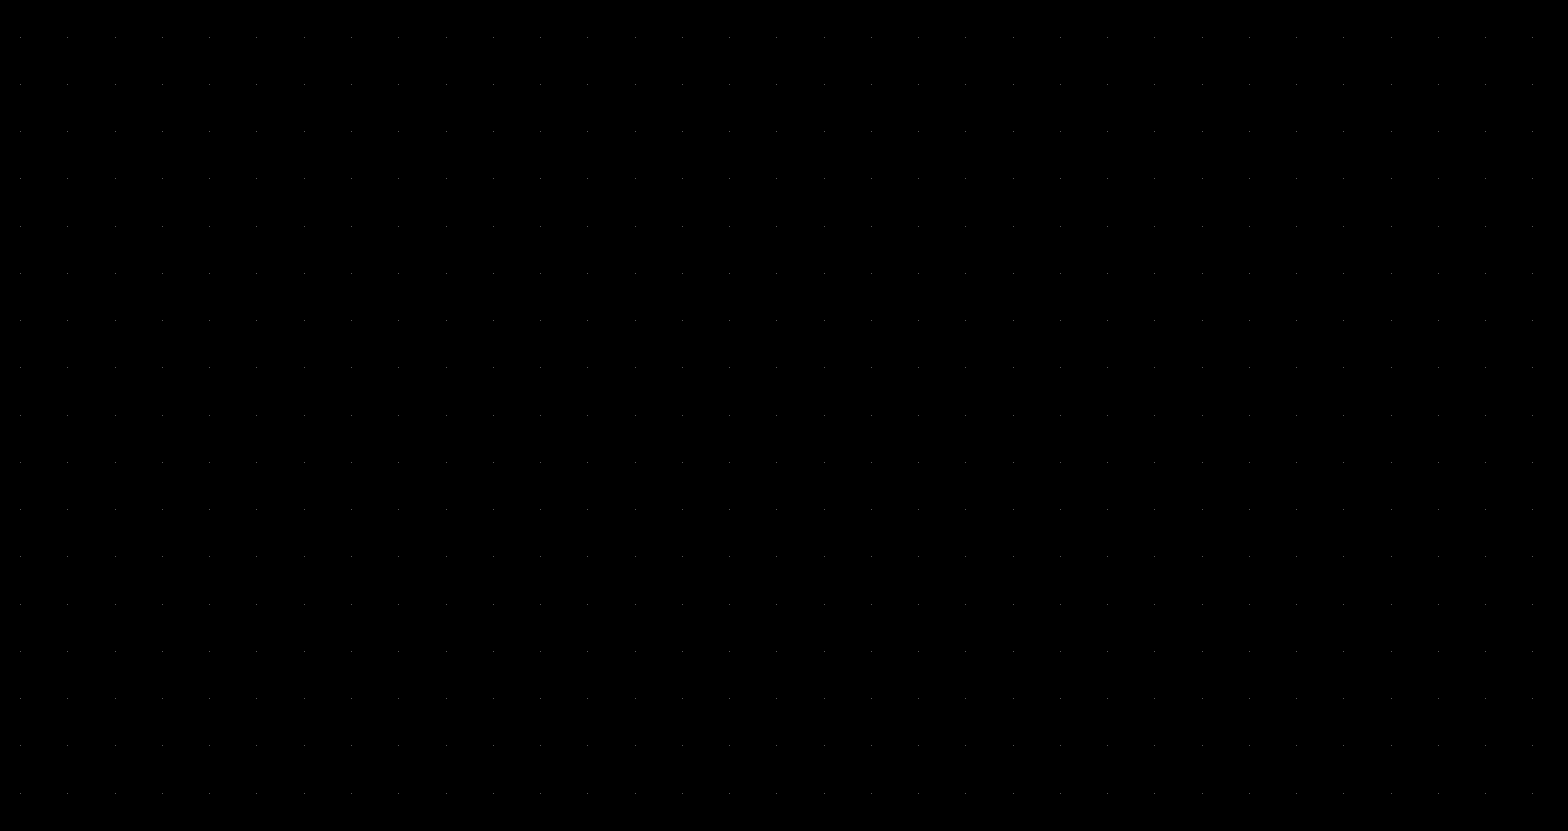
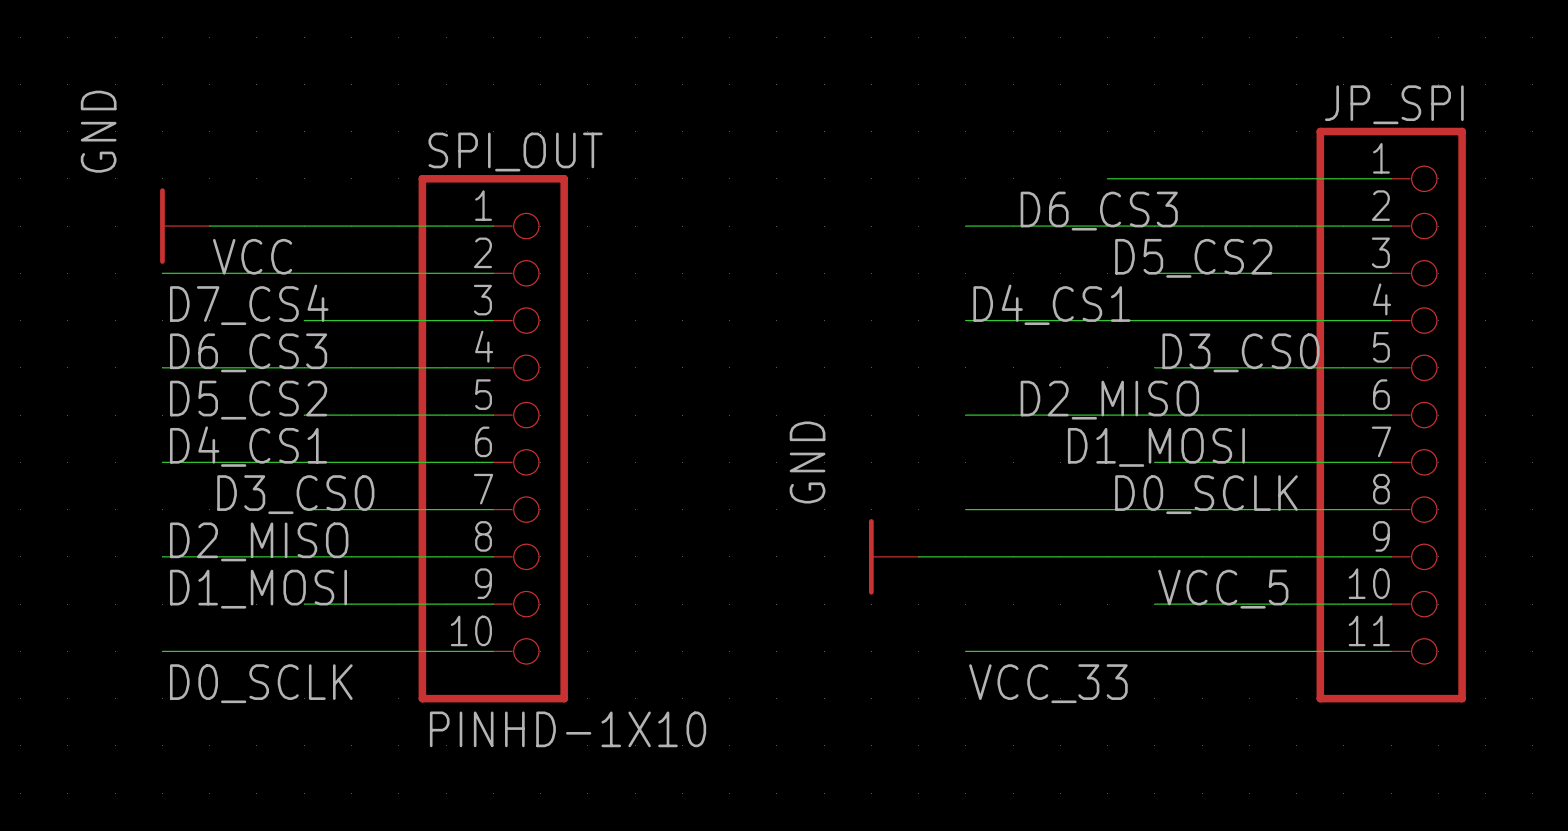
wire: none -> (1107, 178) (1391, 178)
label: none -> D6_CS3 (1099, 211)
power symbol: none -> GND (184, 226)
wire: none -> (209, 226) (493, 226)
wire: none -> (965, 226) (1391, 226)
label: none -> VCC (252, 256)
label: none -> D5_CS2 (1193, 258)
wire: none -> (162, 273) (493, 273)
wire: none -> (1154, 273) (1391, 273)
label: none -> D7_CS4 (249, 304)
label: none -> D4_CS1 (1051, 304)
wire: none -> (304, 320) (493, 320)
wire: none -> (965, 320) (1391, 320)
label: none -> D6_CS3 (248, 352)
label: none -> D3_CS0 (1241, 352)
wire: none -> (162, 367) (493, 367)
wire: none -> (1154, 367) (1391, 367)
label: none -> D5_CS2 (248, 400)
label: none -> D2_MISO (1109, 400)
wire: none -> (304, 415) (493, 415)
wire: none -> (965, 415) (1391, 415)
JP_SPI: none -> (1391, 415)
SPI_OUT: none -> PINHD-1X10 (493, 438)
label: none -> D4_CS1 (248, 446)
label: none -> D1_MOSI (1156, 447)
wire: none -> (162, 462) (493, 462)
wire: none -> (1154, 462) (1391, 462)
label: none -> D3_CS0 (295, 494)
label: none -> D0_SCLK (1206, 494)
wire: none -> (304, 509) (493, 509)
wire: none -> (965, 509) (1391, 509)
label: none -> D2_MISO (259, 541)
wire: none -> (162, 556) (493, 556)
power symbol: none -> GND (893, 556)
wire: none -> (918, 556) (1391, 556)
label: none -> D1_MOSI (258, 589)
label: none -> VCC_5 (1223, 589)
wire: none -> (304, 604) (493, 604)
wire: none -> (1154, 604) (1391, 604)
wire: none -> (162, 651) (493, 651)
wire: none -> (965, 651) (1391, 651)
label: none -> D0_SCLK (261, 683)
label: none -> VCC_33 (1048, 683)

